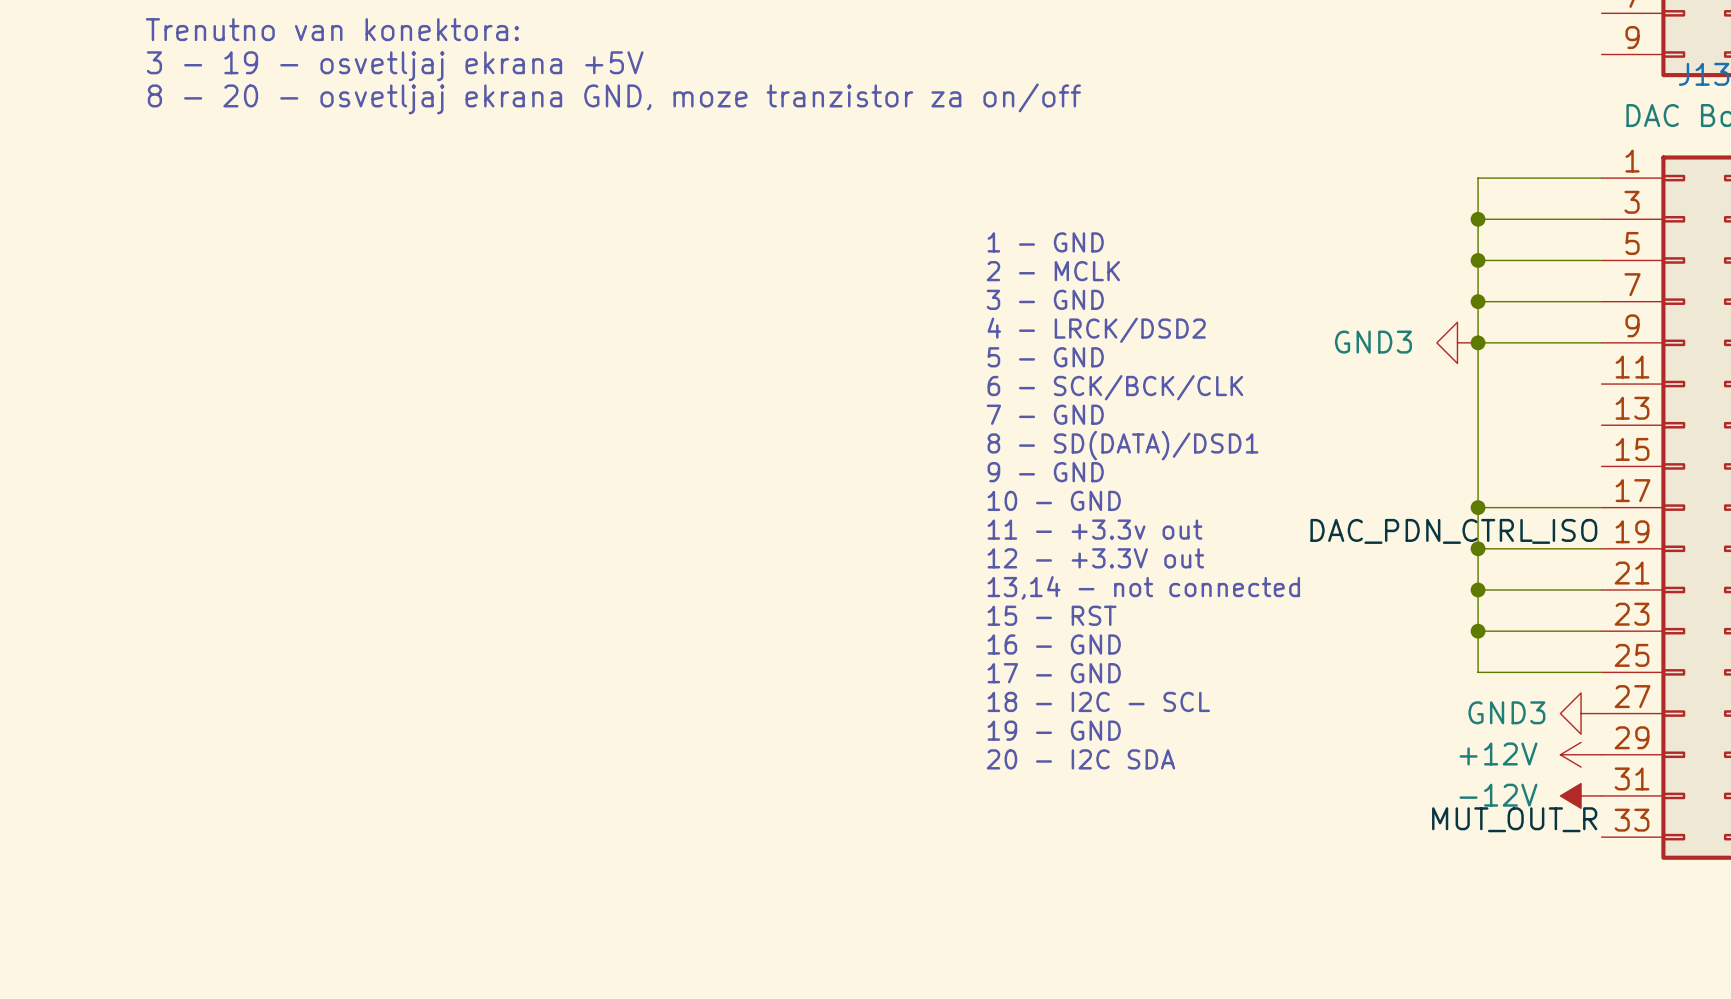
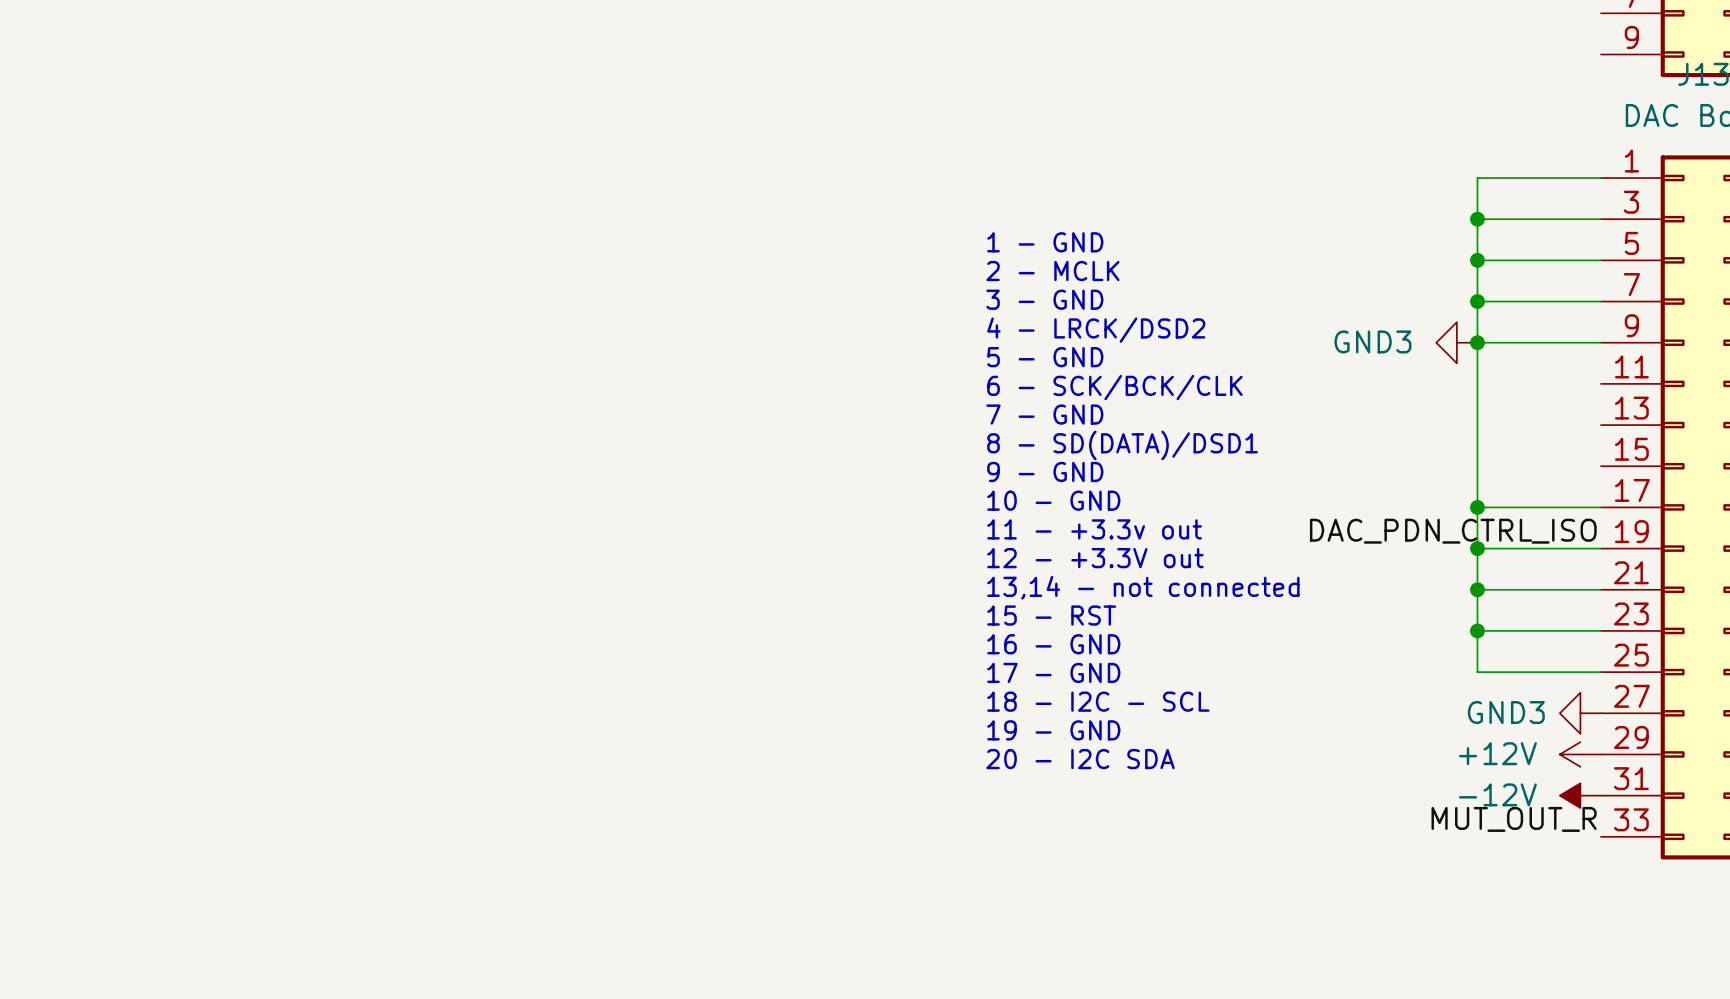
text: Trenutno van konektora: (332, 29) -> none
text: 3 - 19 - osvetljaj ekrana +5V (395, 66) -> none
text: 8 - 20 - osvetljaj ekrana GND, moze tranzistor za on/off (614, 98) -> none

